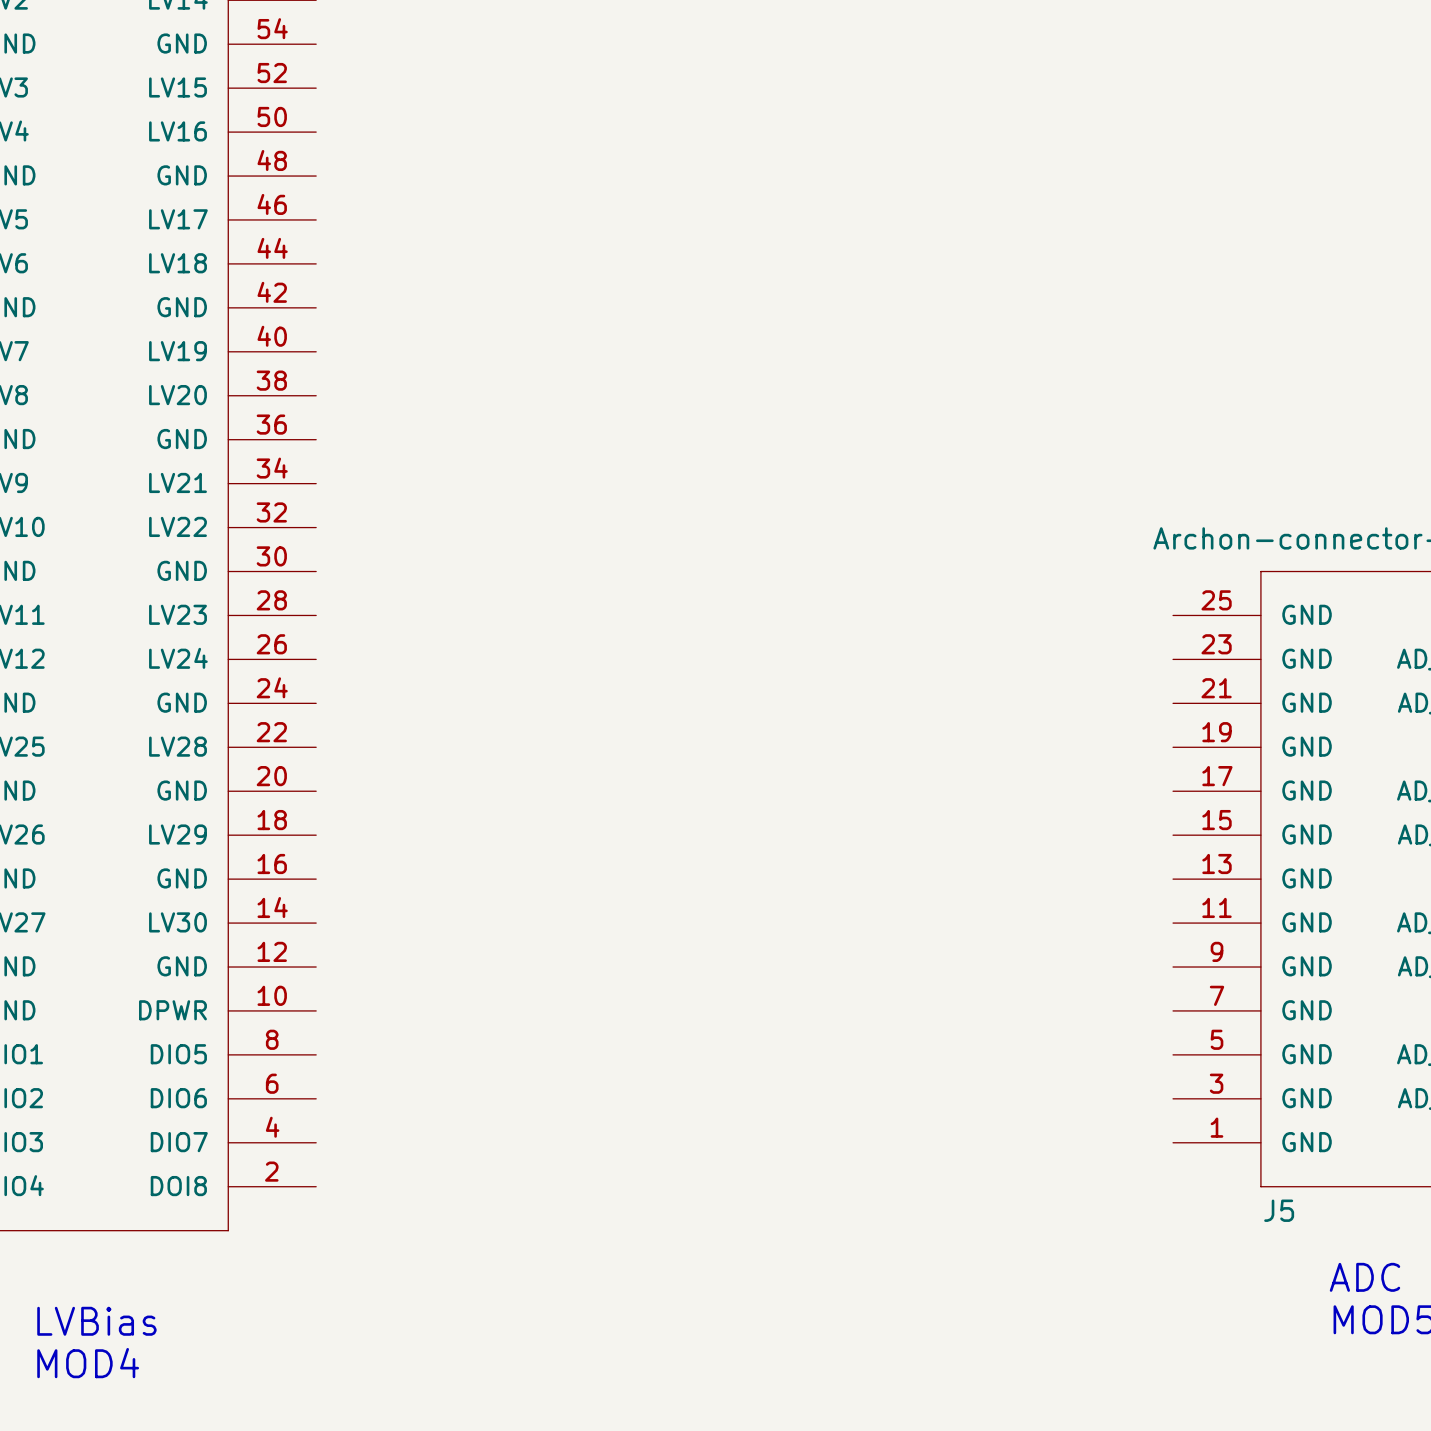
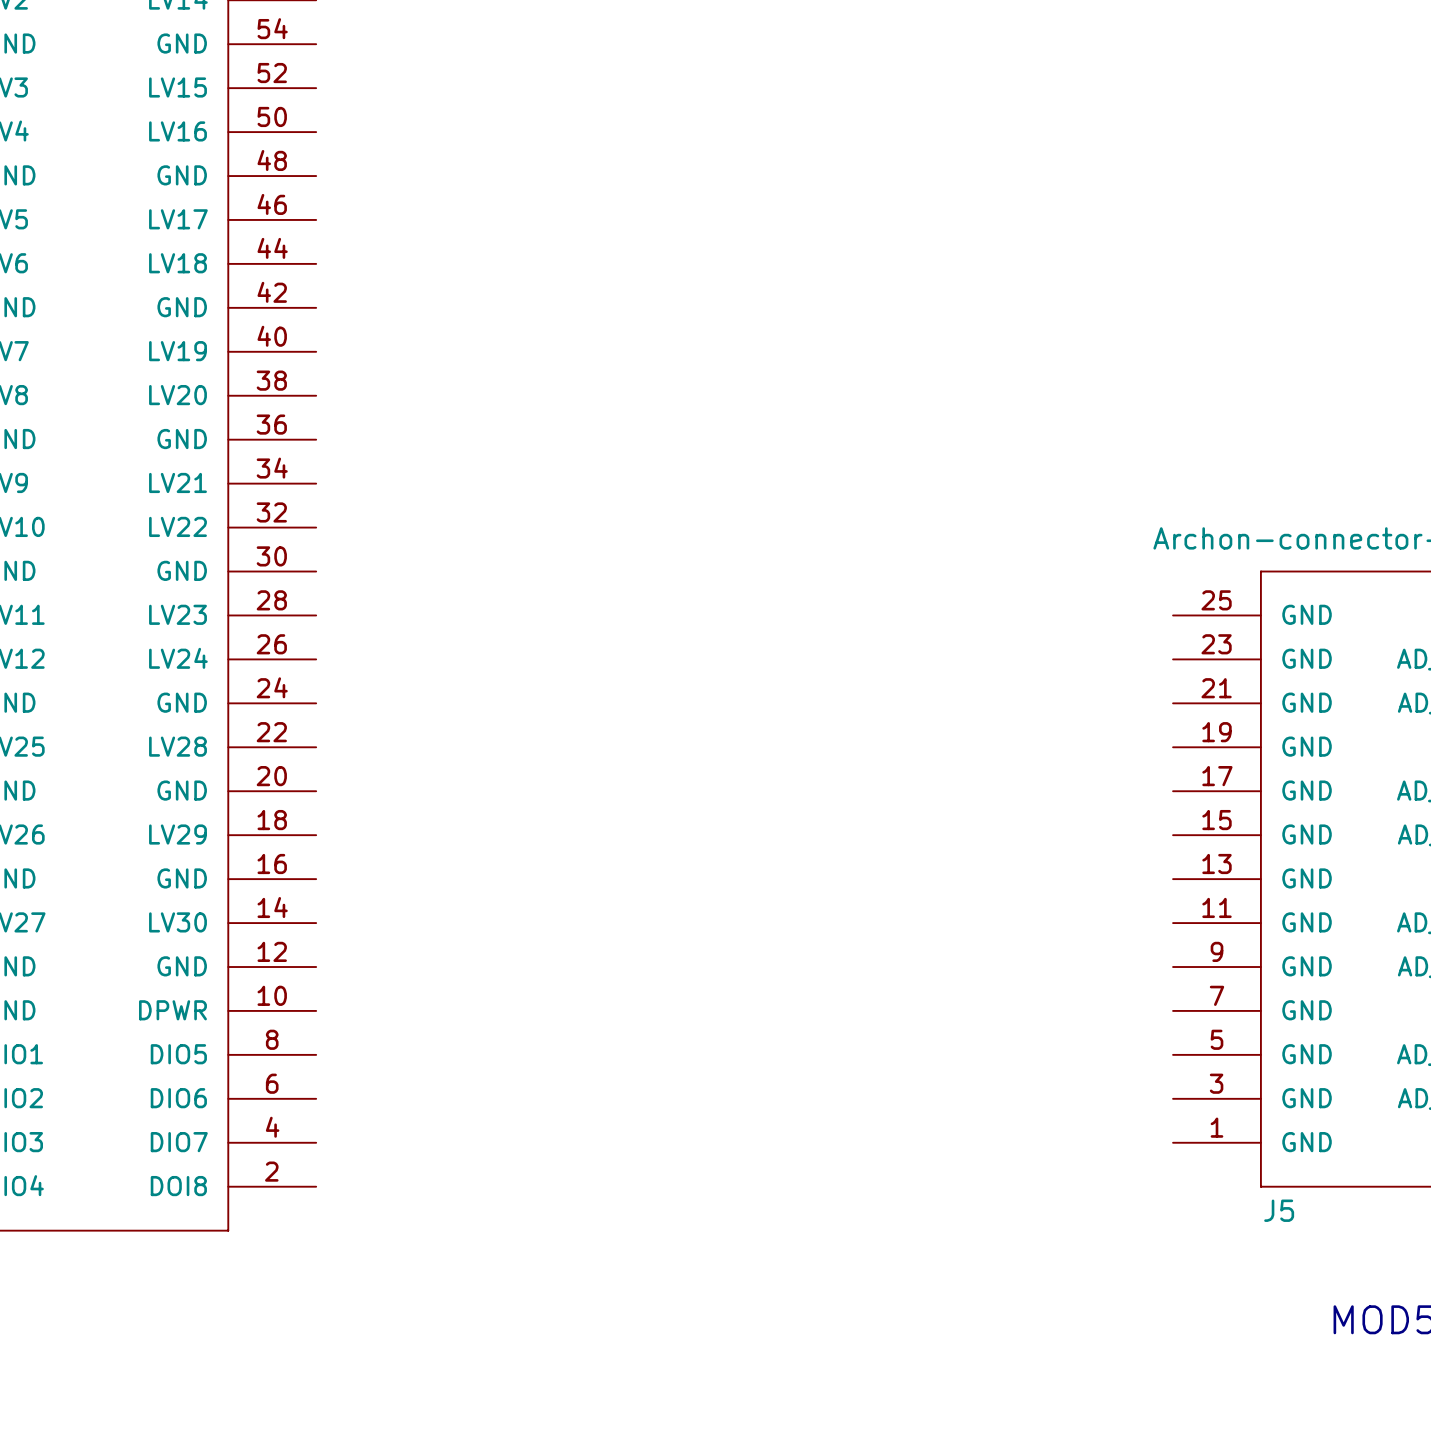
text: ADC (1365, 1277) -> none
text: LVBias (96, 1321) -> none
text: MOD4 (88, 1363) -> none

